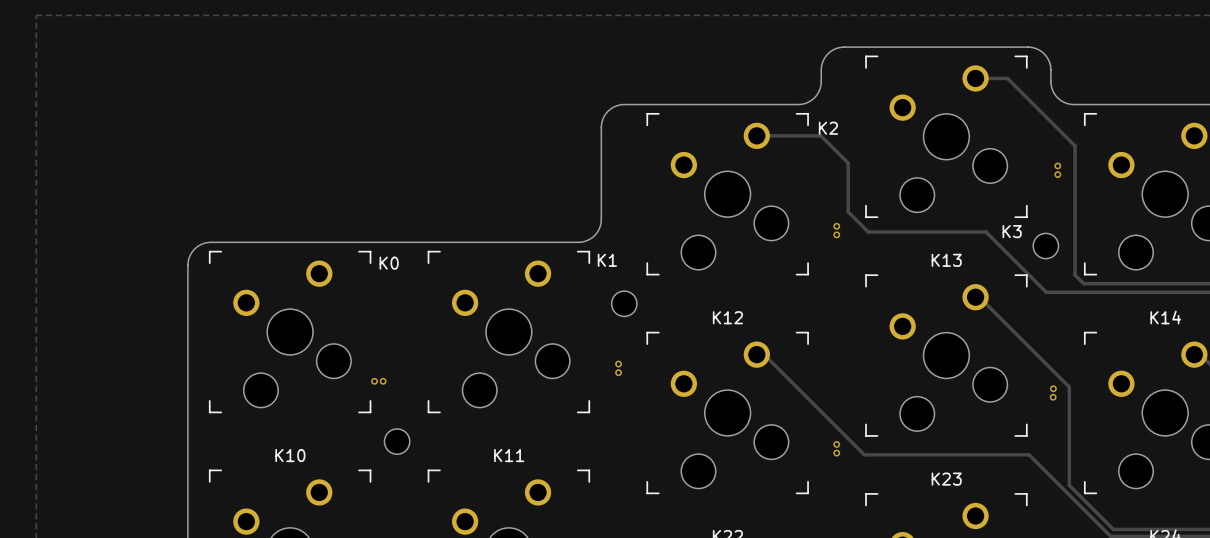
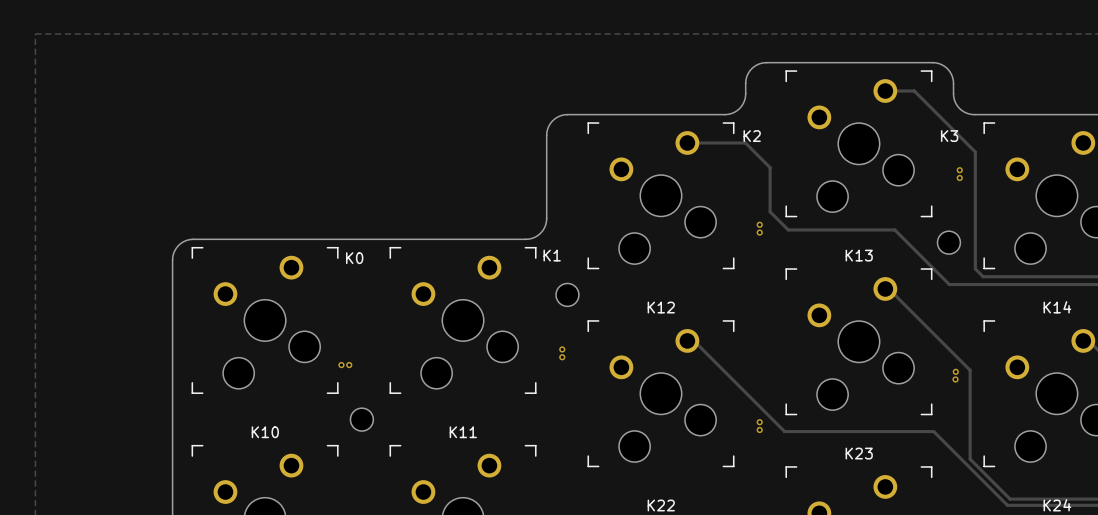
K3 name position: K3 (1012, 231) -> K3 (949, 136)

